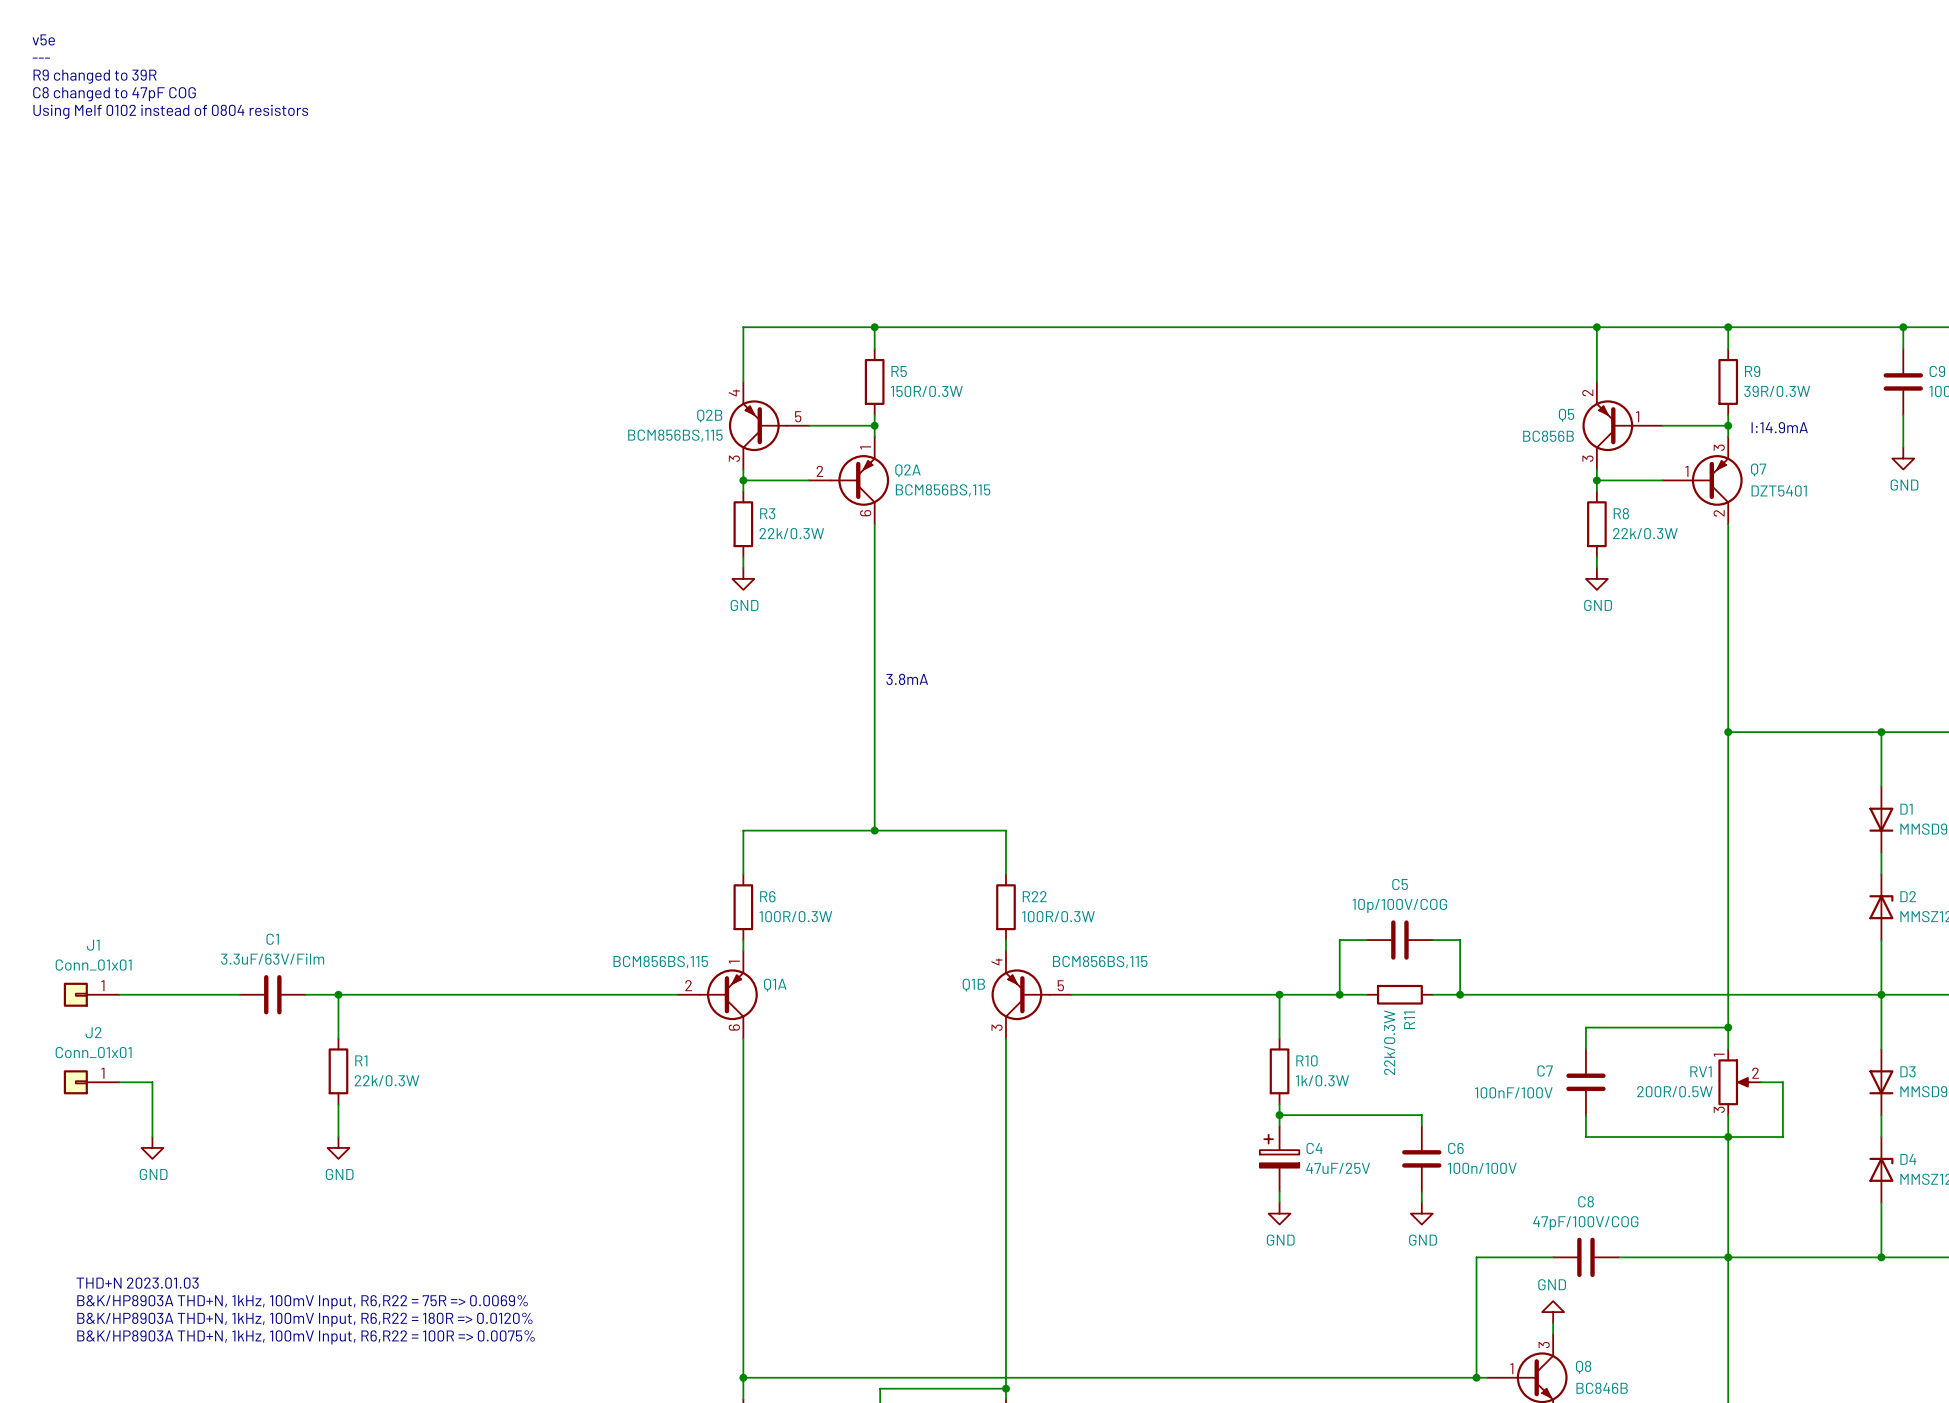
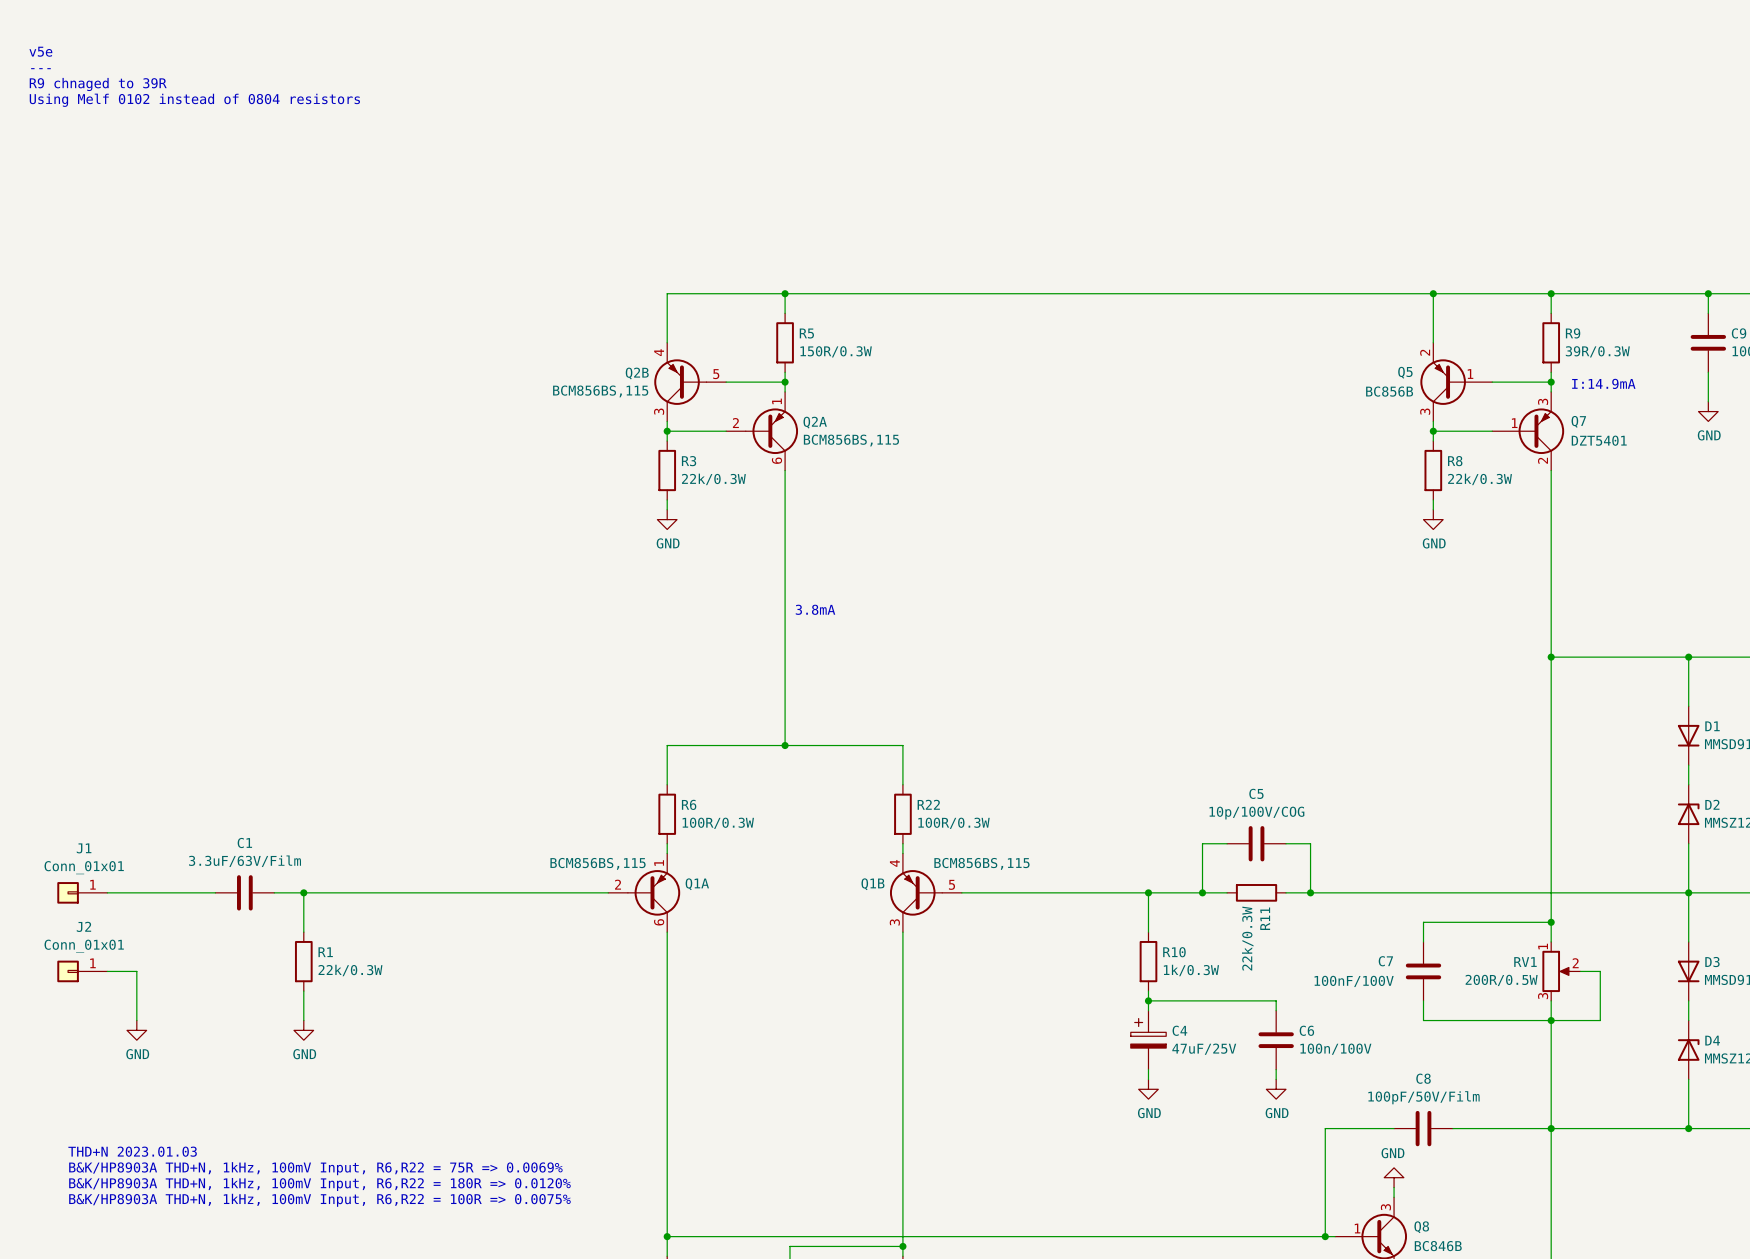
text: v5e (43, 39) -> none
text: --- (41, 58) -> v5e (40, 51)
text: R9 changed to 39R (95, 76) -> --- (40, 68)
text: C8 changed to 47pF COG (114, 94) -> R9 chnaged to 39R (98, 84)
C8 value: 47pF/100V/COG (1585, 1223) -> 100pF/50V/Film (1423, 1097)

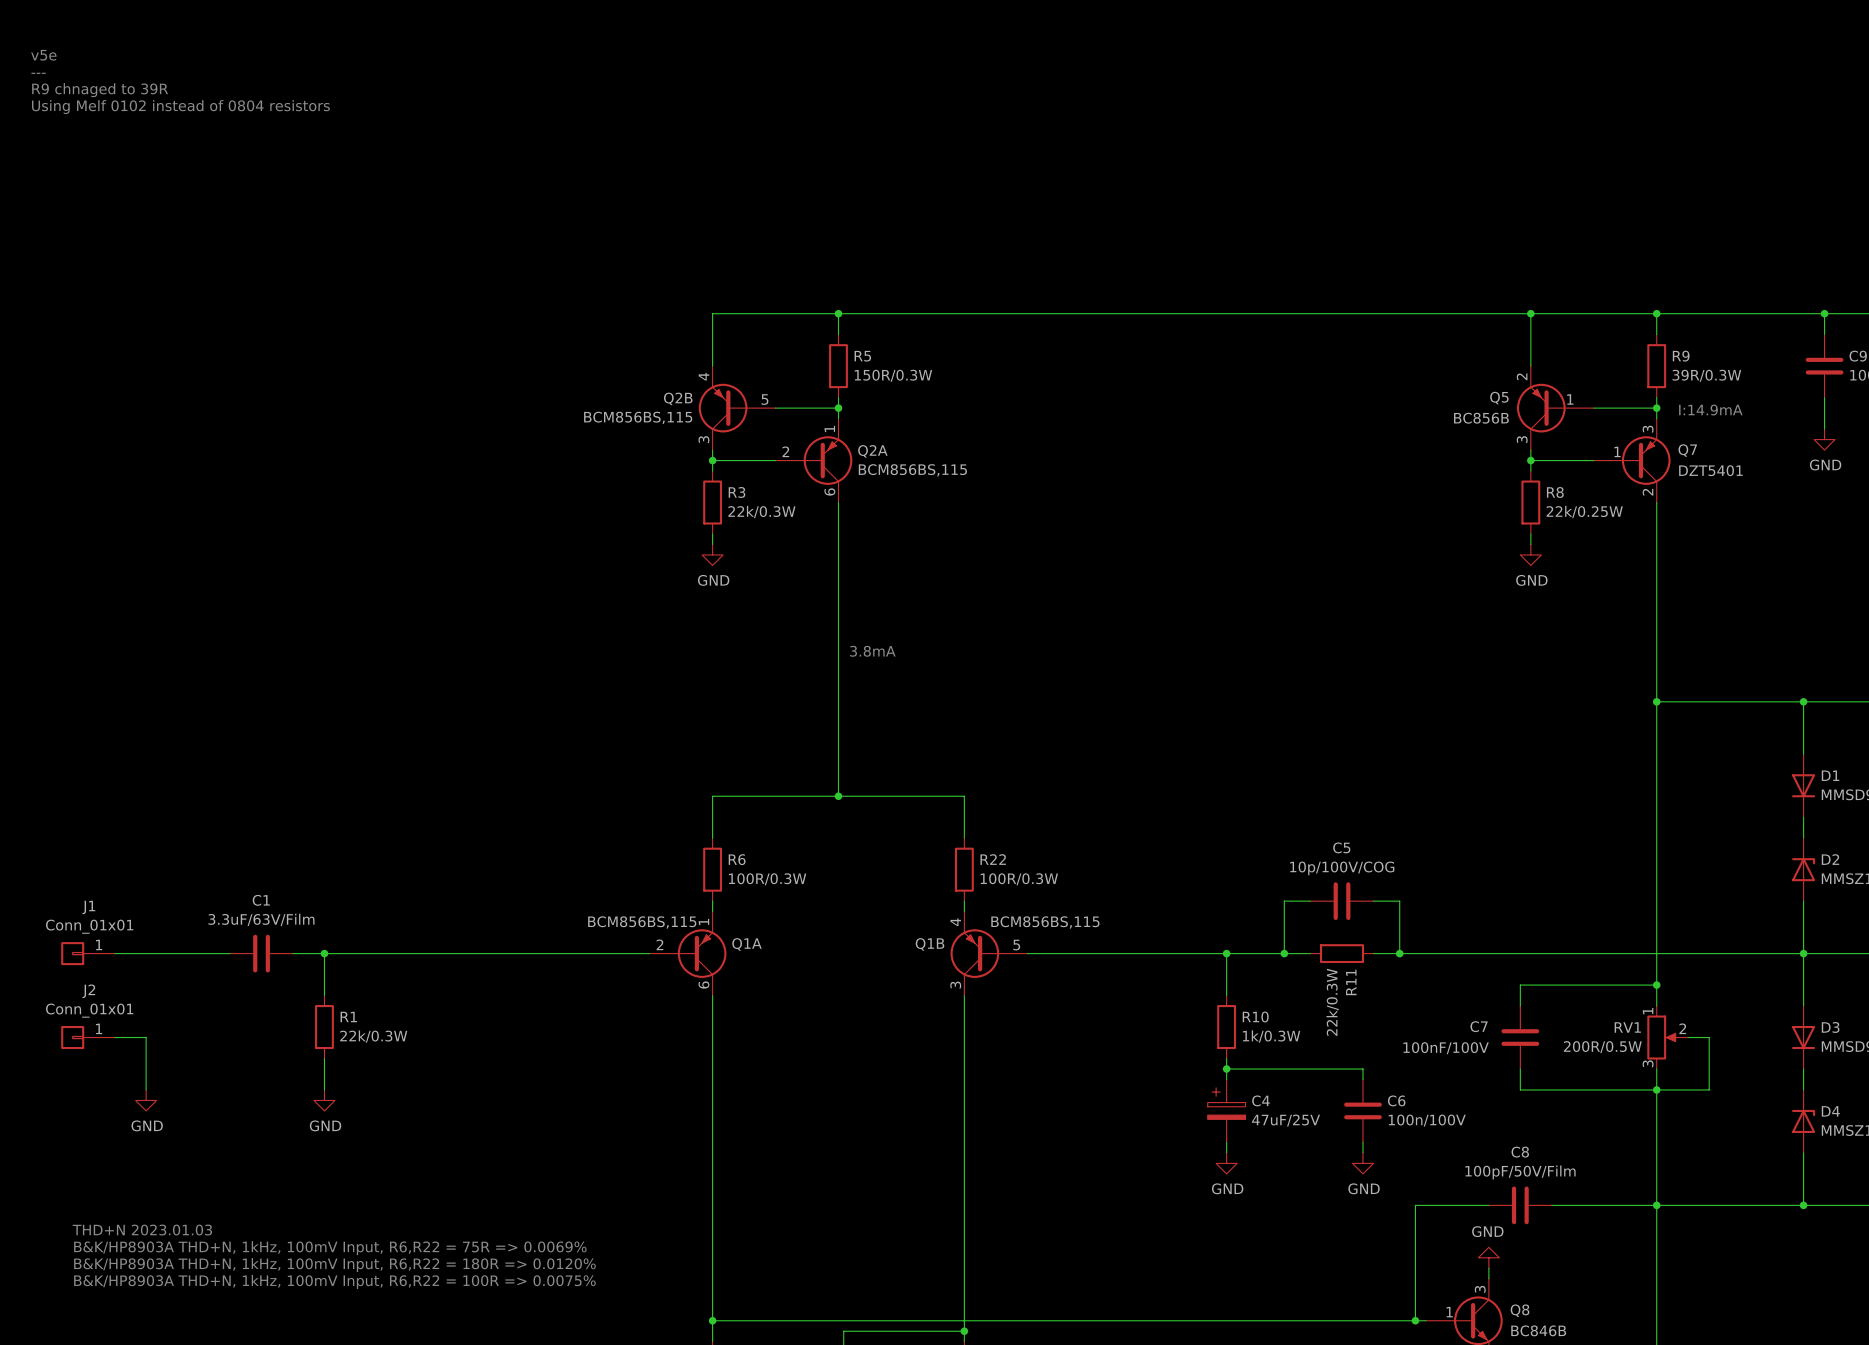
R8 value: 22k/0.3W (1480, 479) -> 22k/0.25W (1584, 512)

